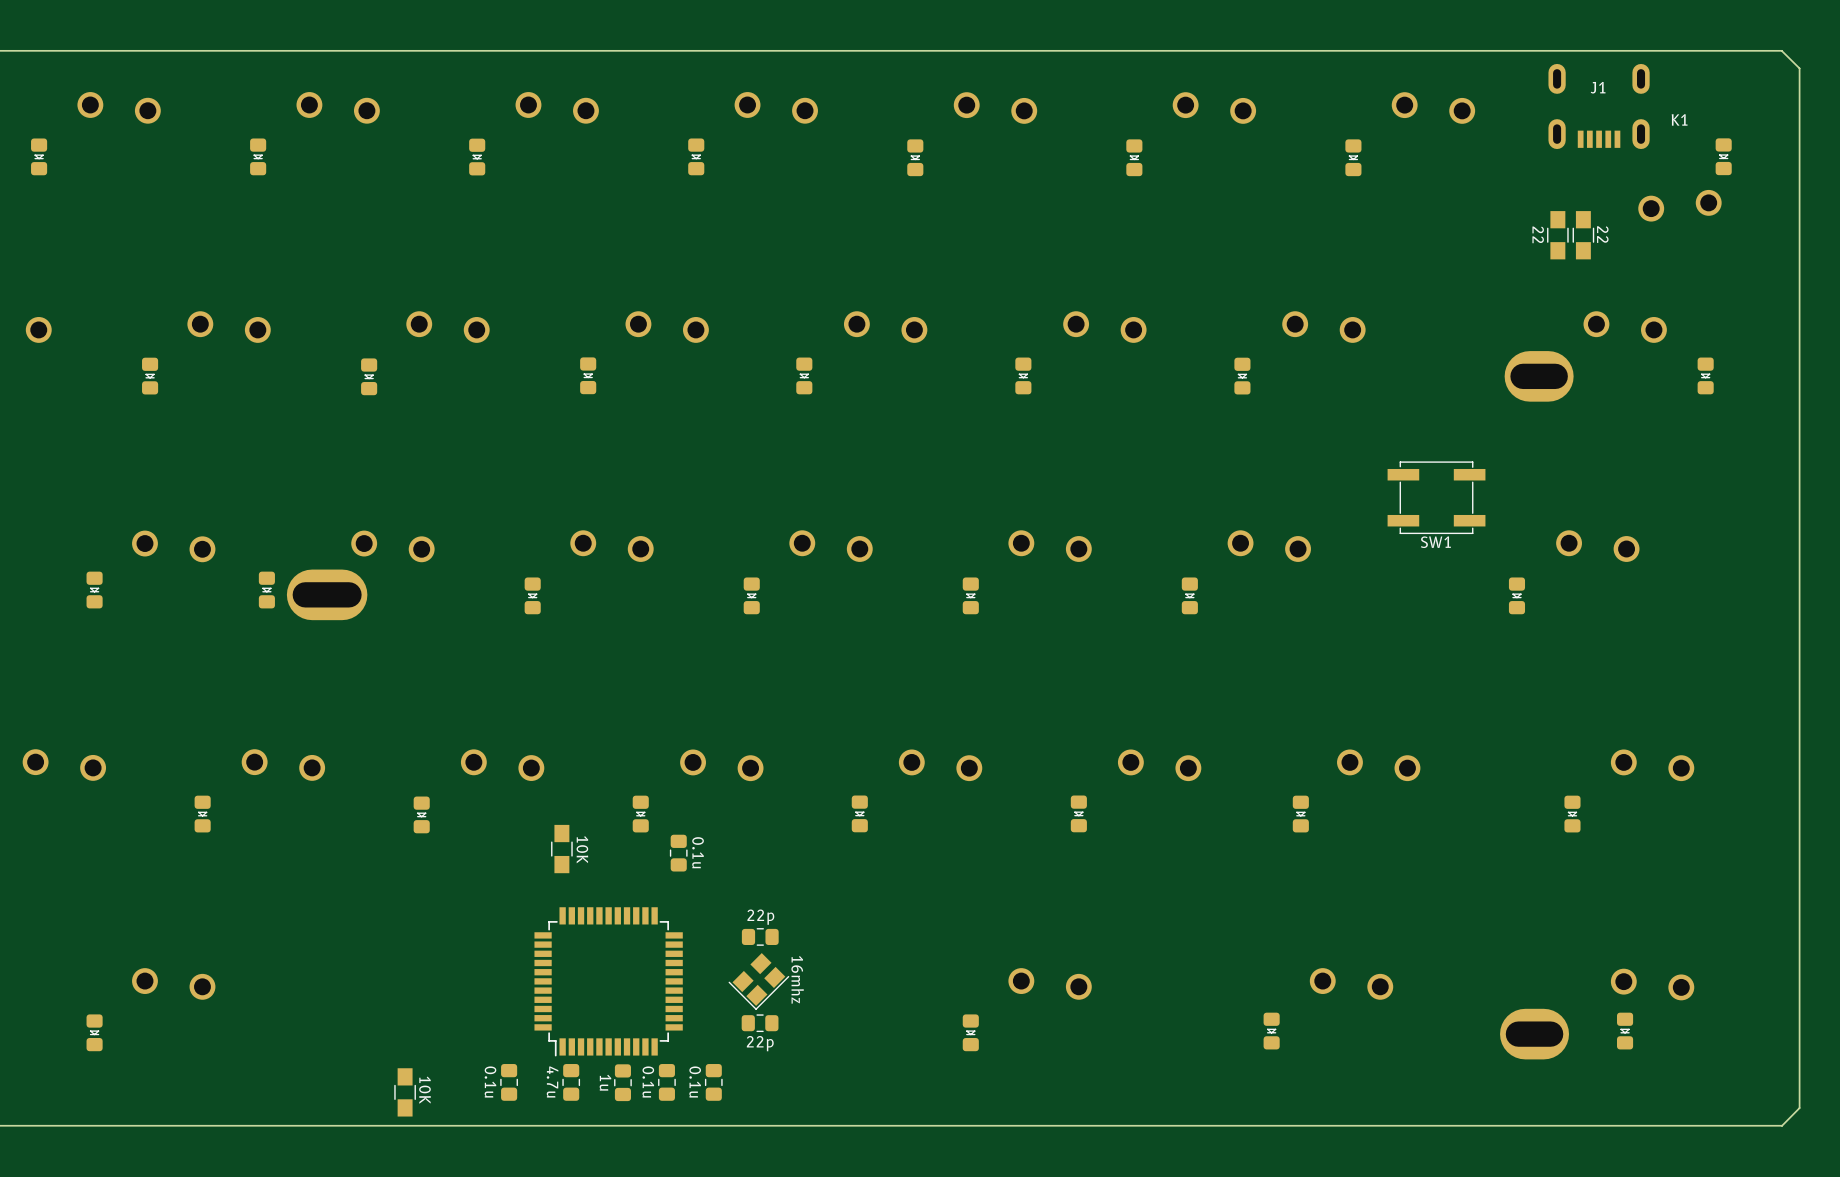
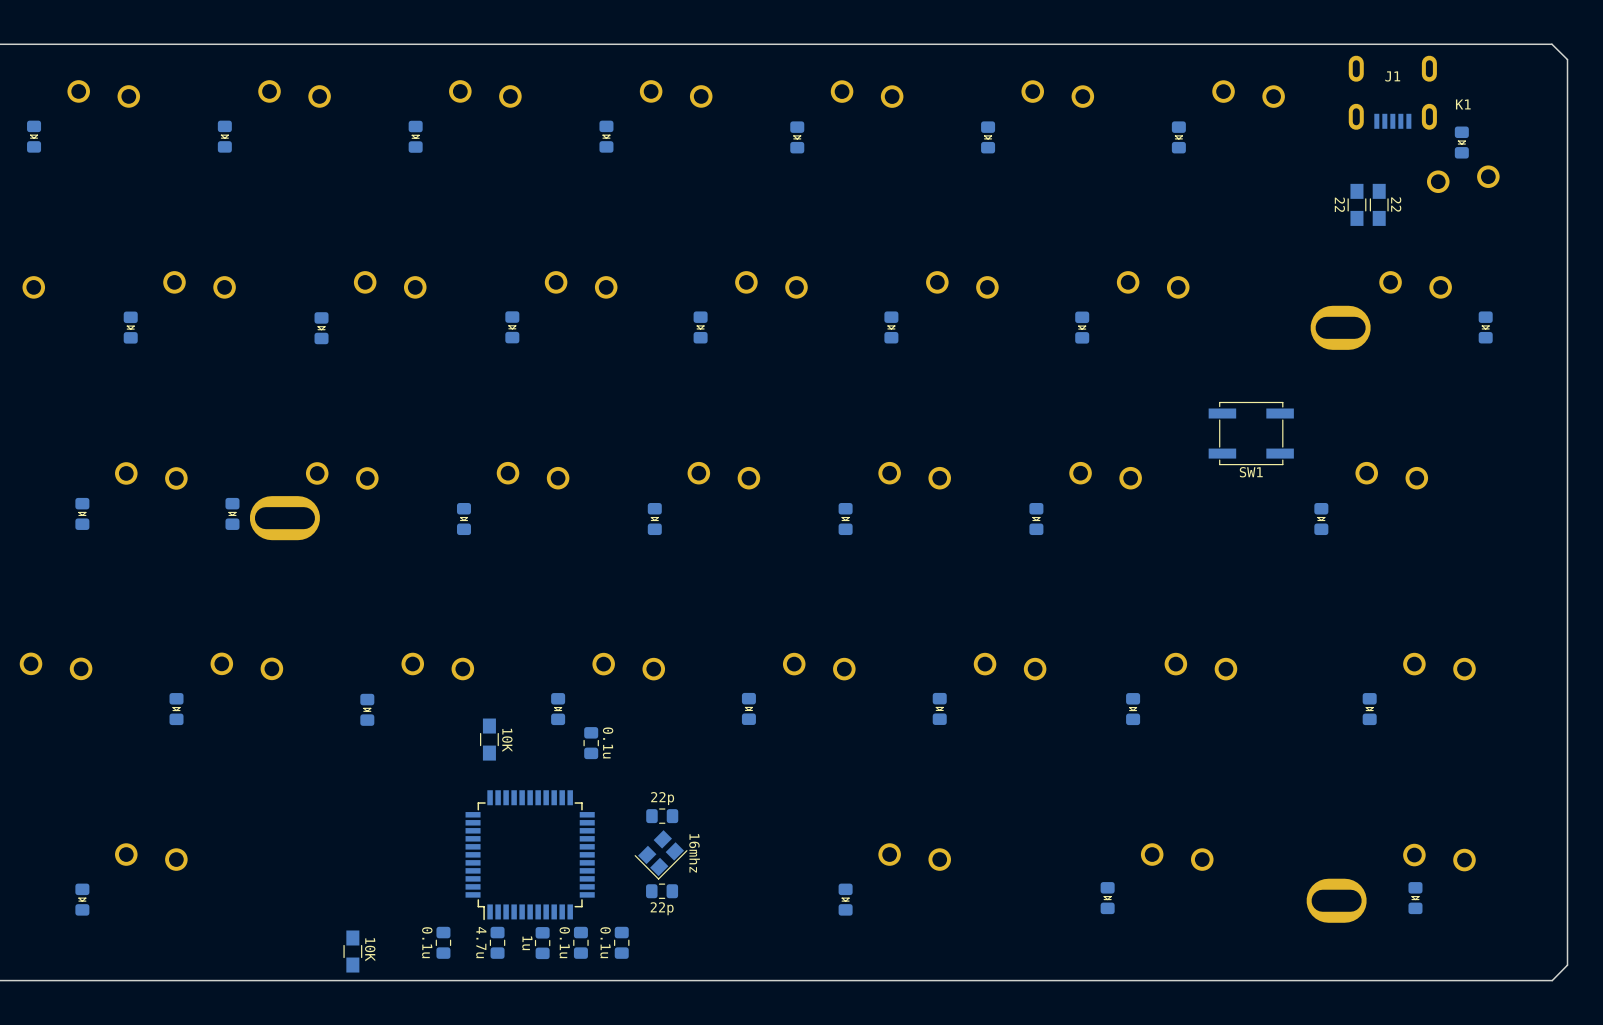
part position: (1723, 156) -> (1461, 142)

